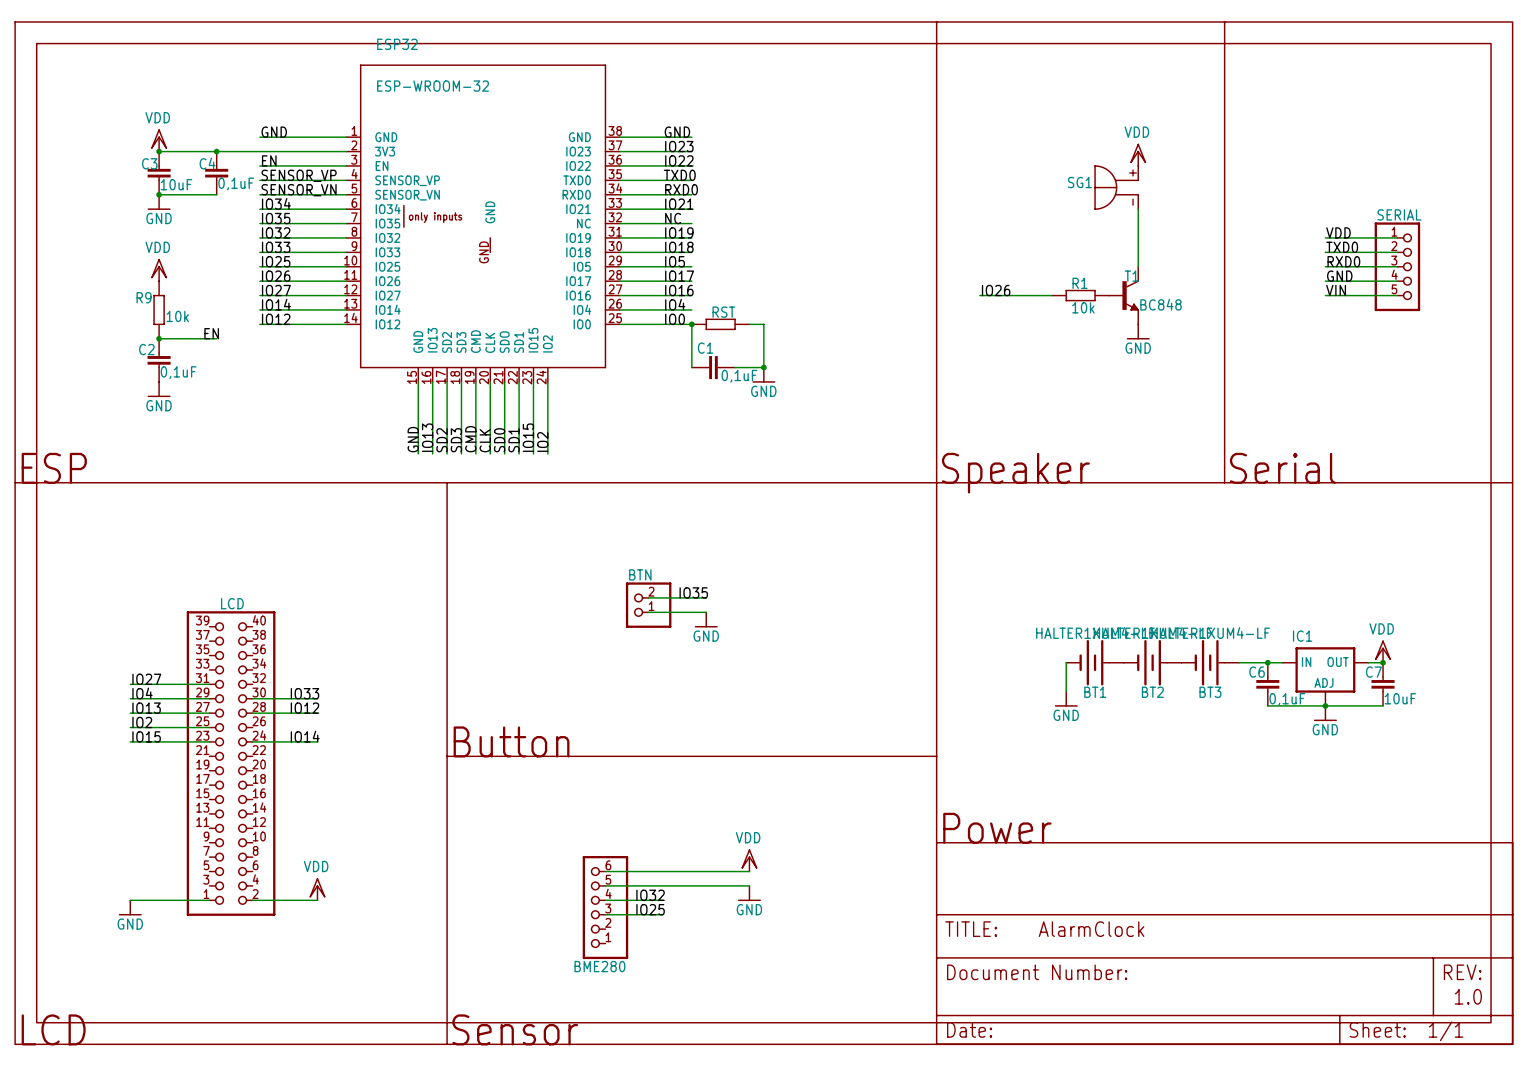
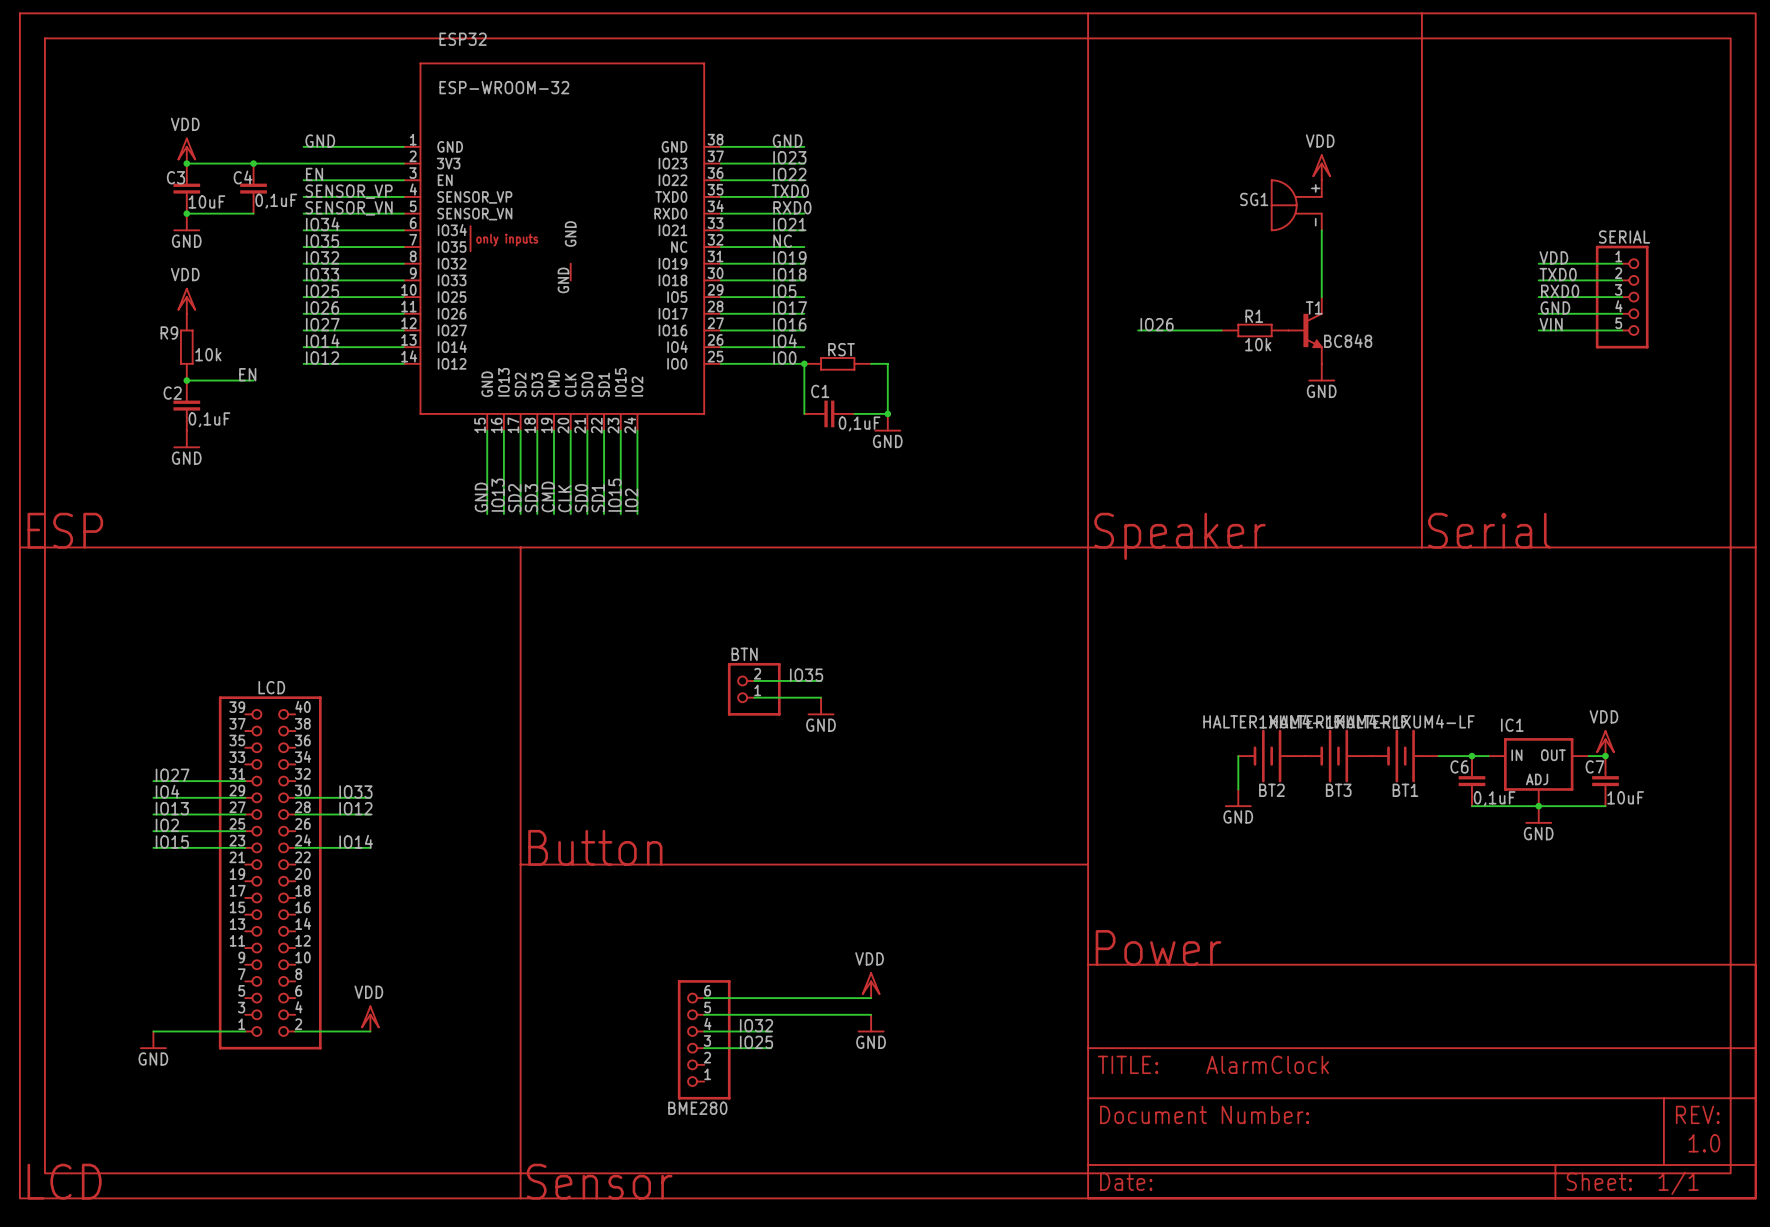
BT1 name: BT1 (1095, 692) -> BT2 (1271, 790)
BT2 name: BT2 (1152, 692) -> BT3 (1338, 790)
BT3 name: BT3 (1210, 692) -> BT1 (1405, 790)

